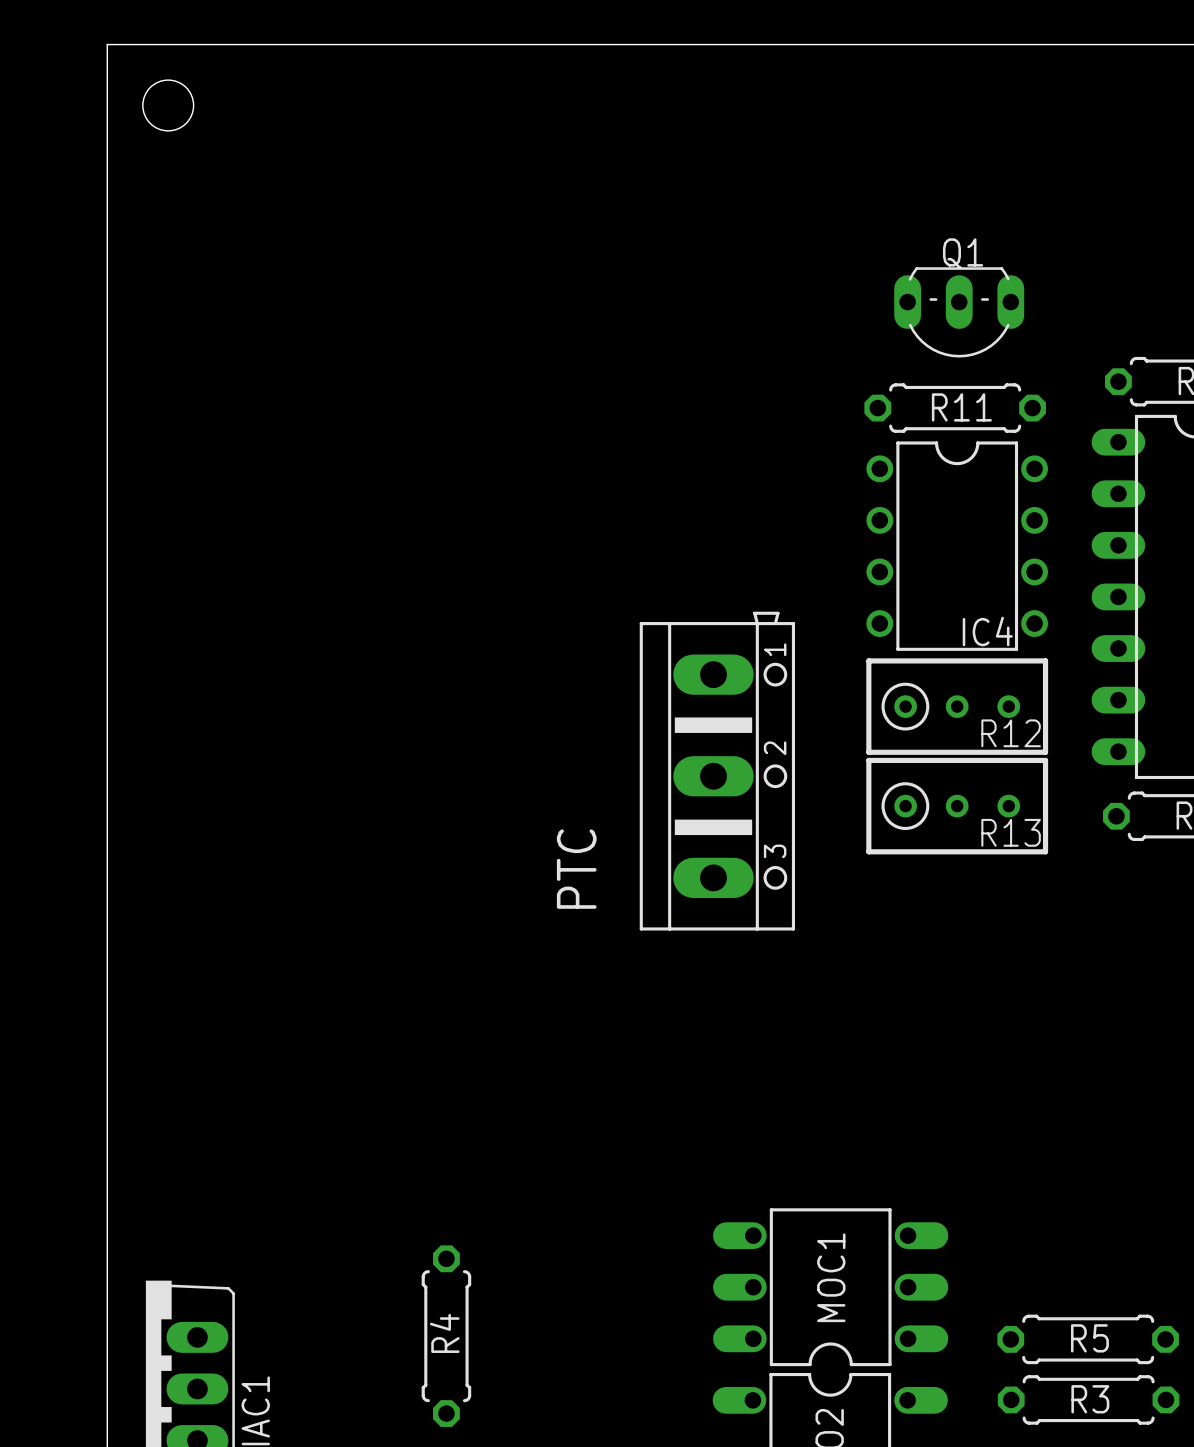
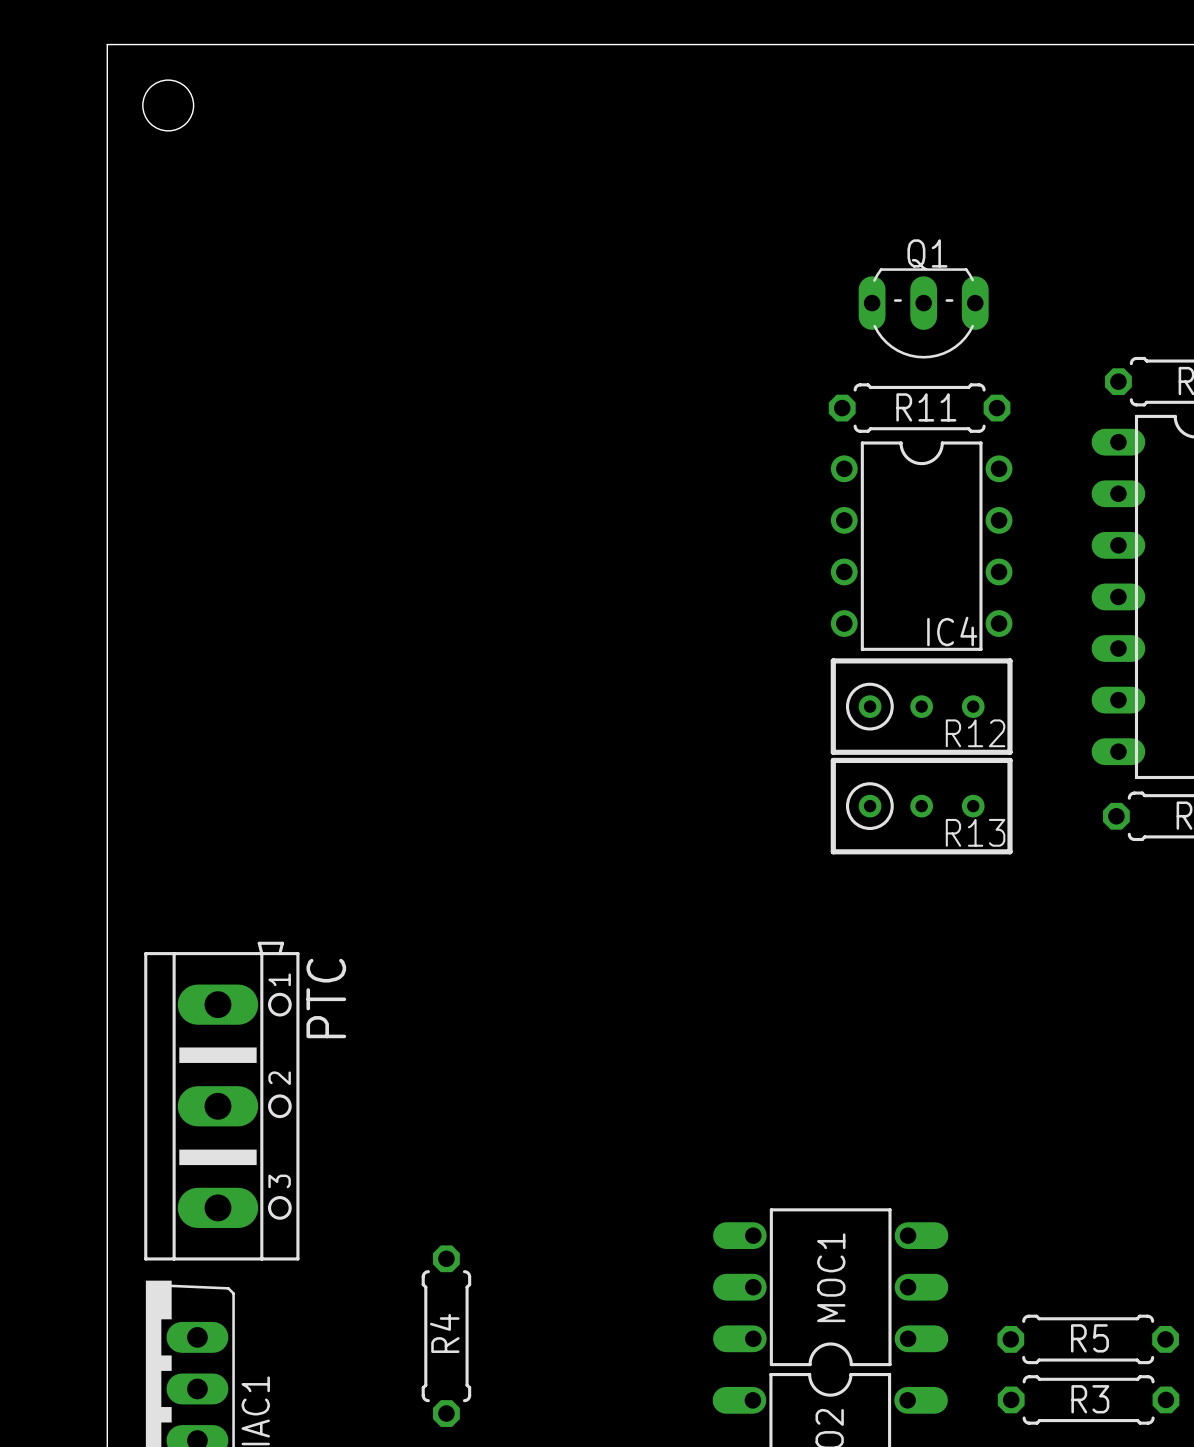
Q1 position: (959, 312) -> (923, 313)
R11 position: (955, 408) -> (919, 408)
IC4 position: (957, 546) -> (921, 546)
R12 position: (957, 706) -> (921, 706)
PTC: (717, 771) -> none
R13 position: (957, 806) -> (921, 806)
PTC: none -> (221, 1101)

